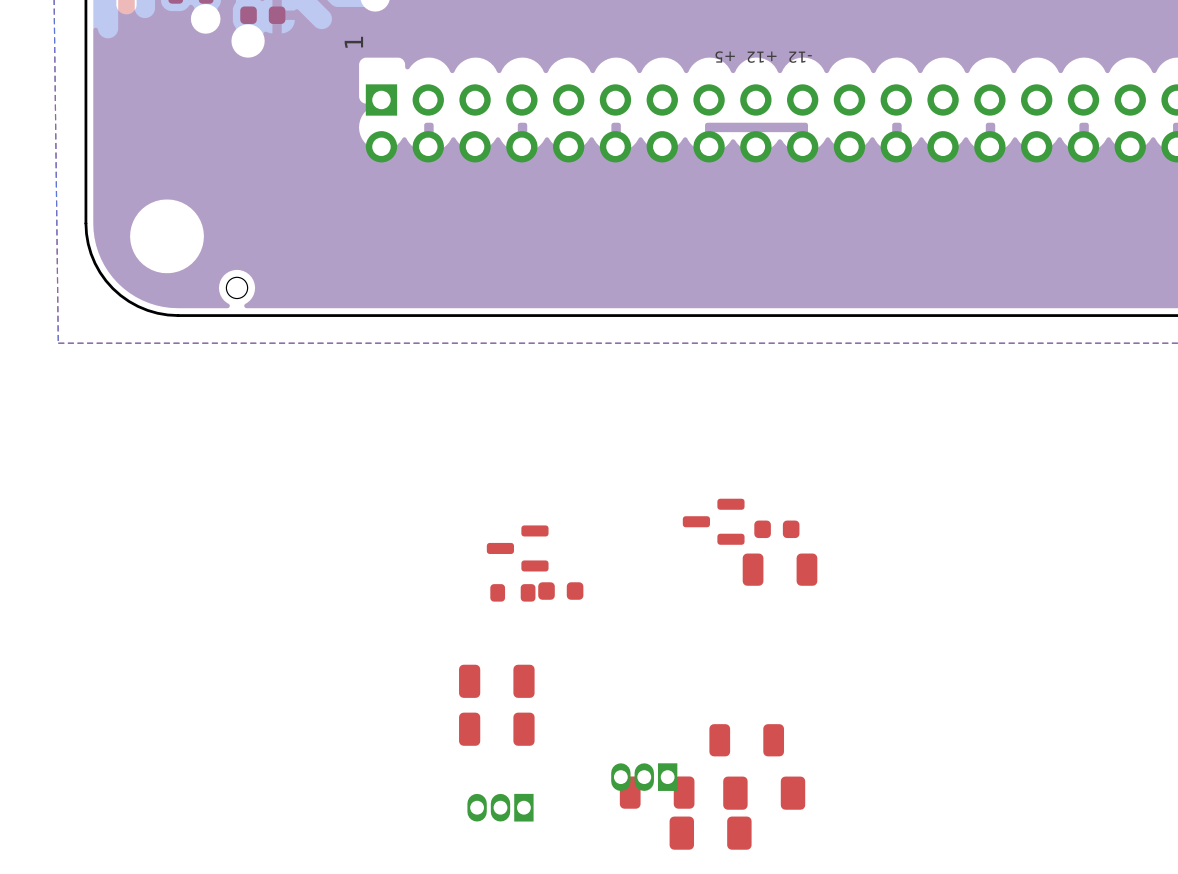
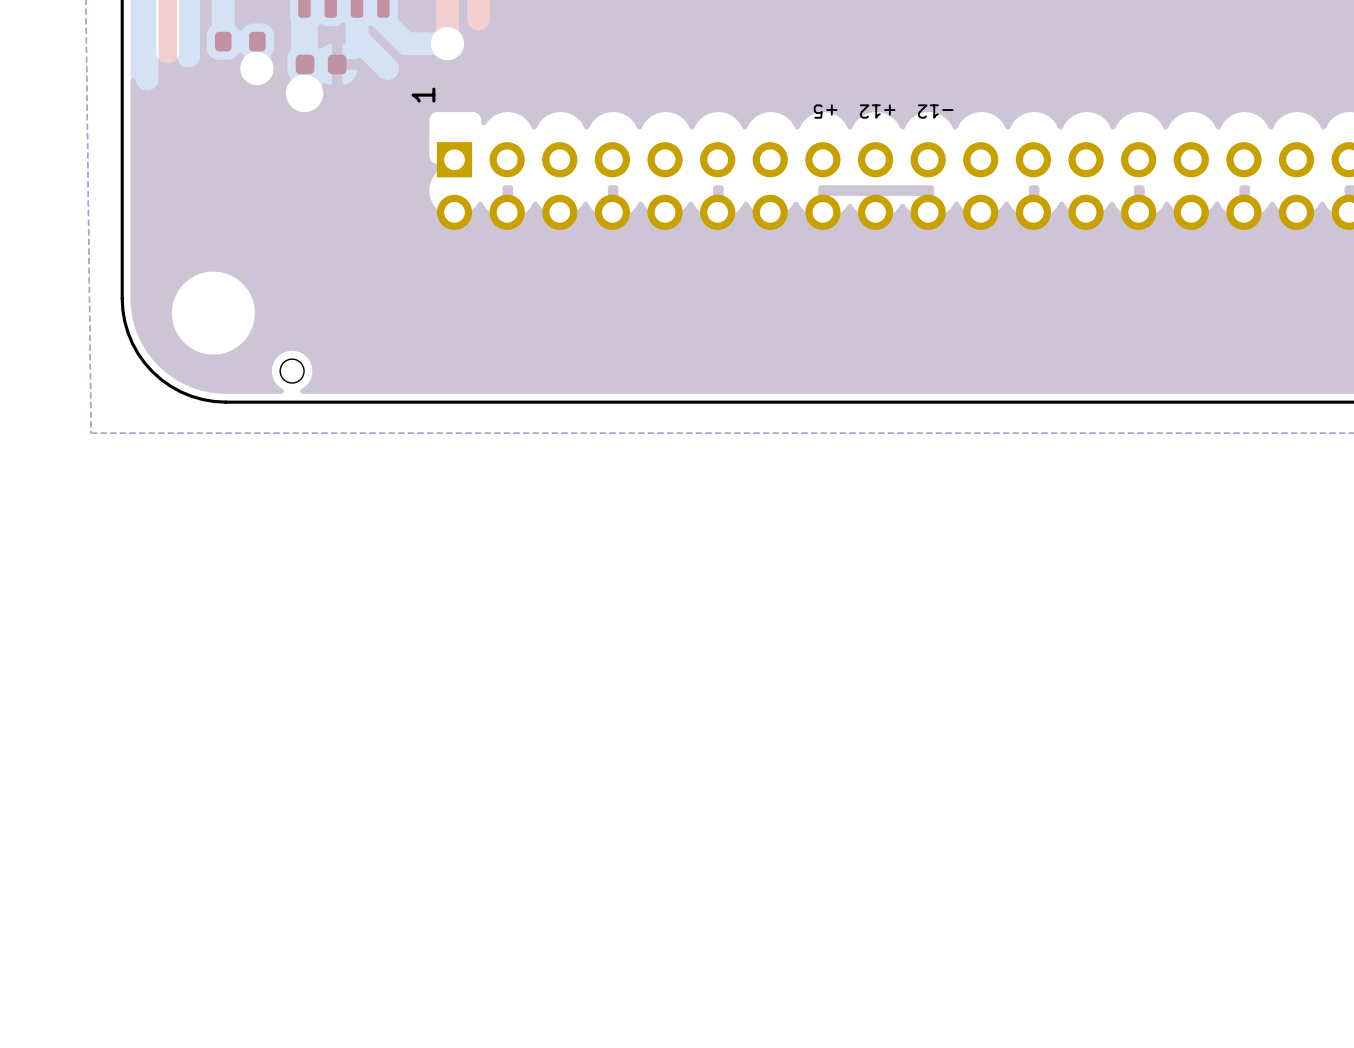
part: (713, 521) -> none
part: (776, 529) -> none
part: (517, 548) -> none
part: (780, 569) -> none
part: (560, 591) -> none
part: (512, 592) -> none
part: (496, 681) -> none
part: (496, 729) -> none
part: (746, 740) -> none
part: (644, 777) -> none
part: (657, 792) -> none
part: (764, 793) -> none
part: (500, 807) -> none
part: (710, 833) -> none

